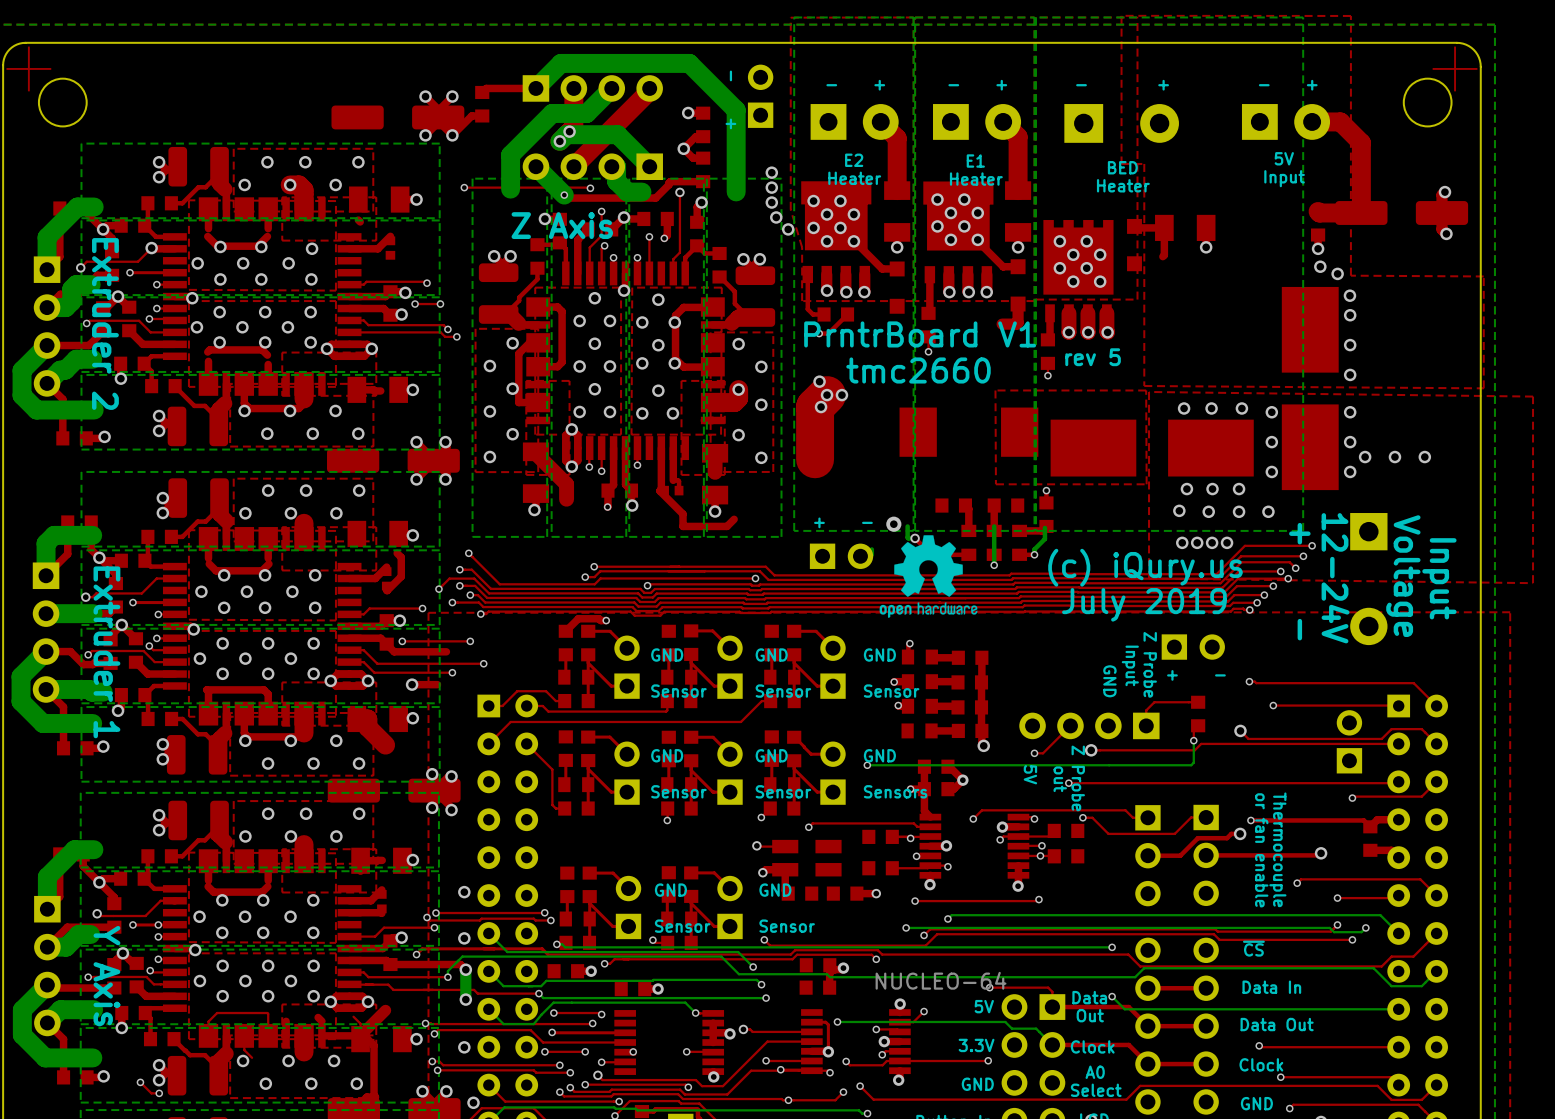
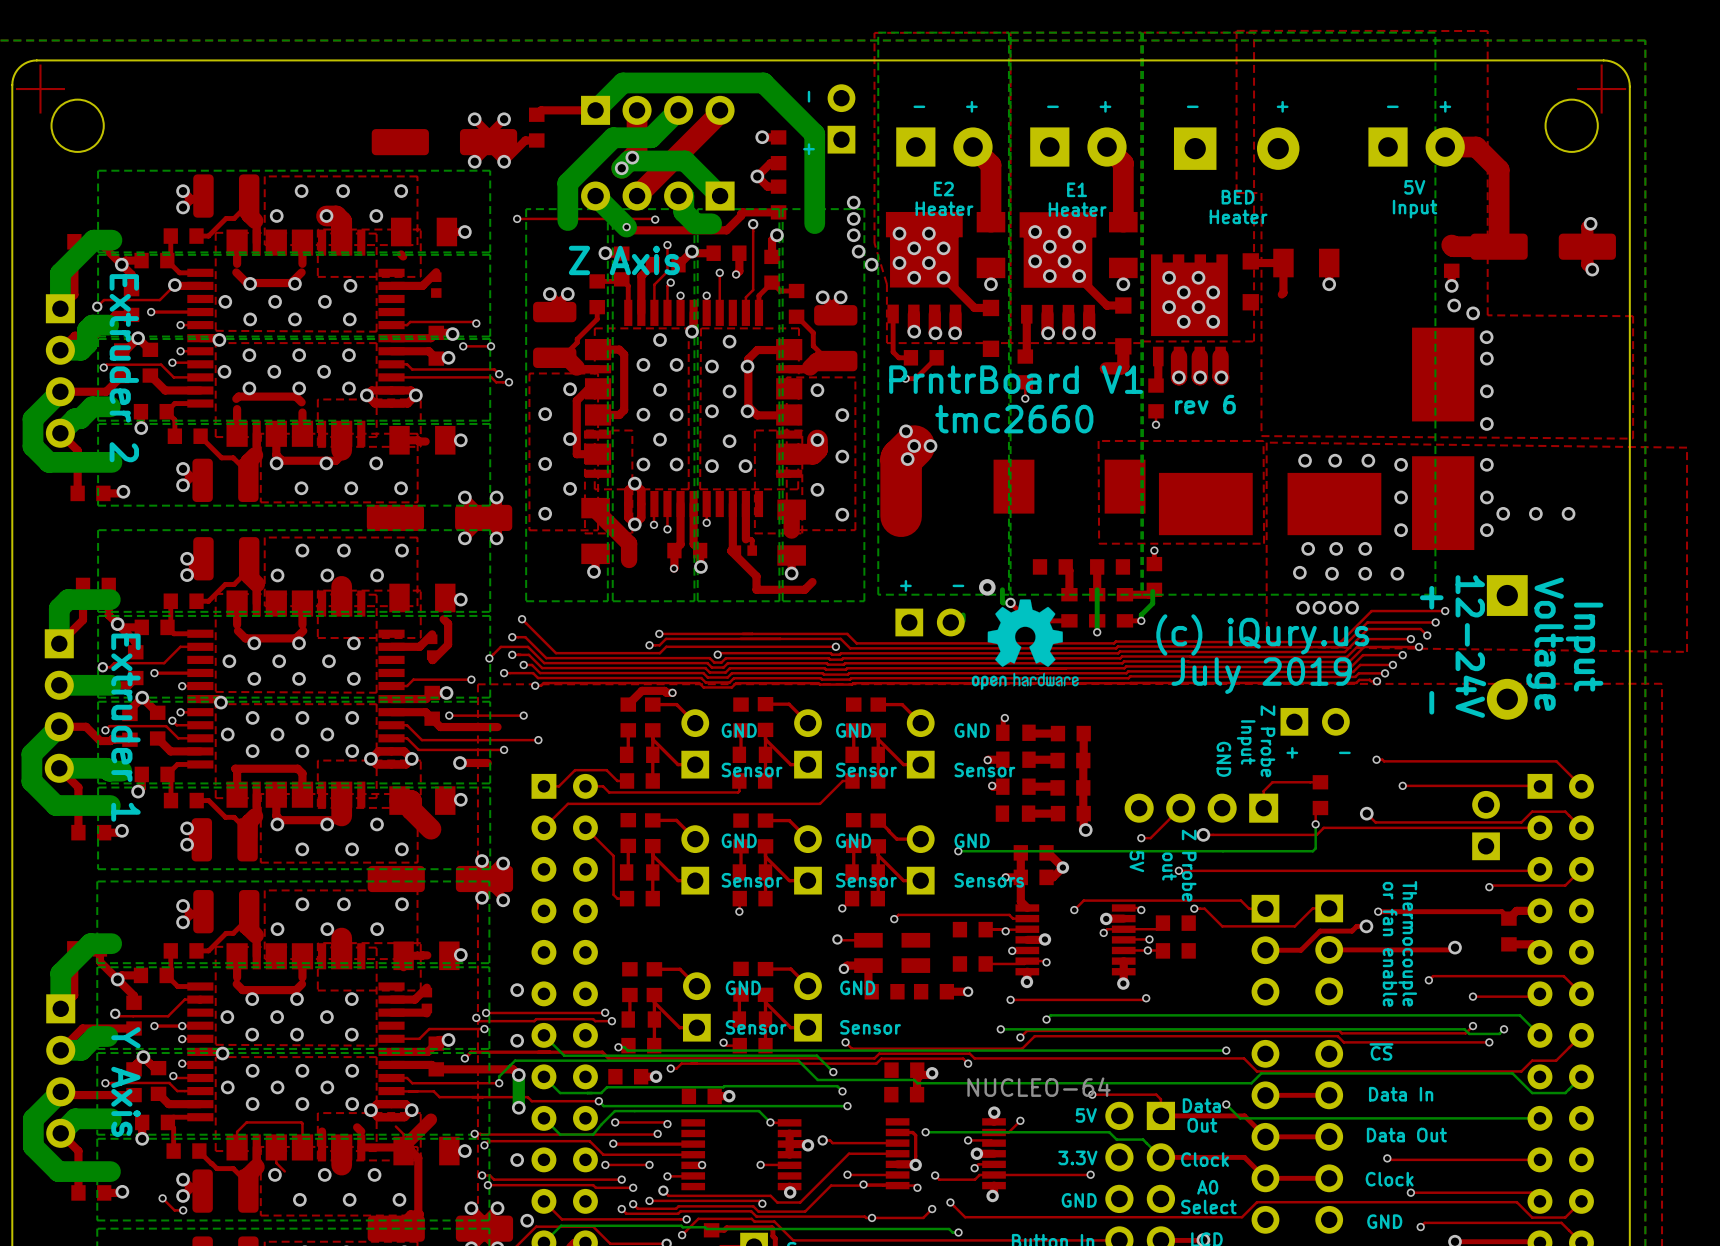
text: rev 5 (1093, 357) -> rev 6 (1205, 404)

